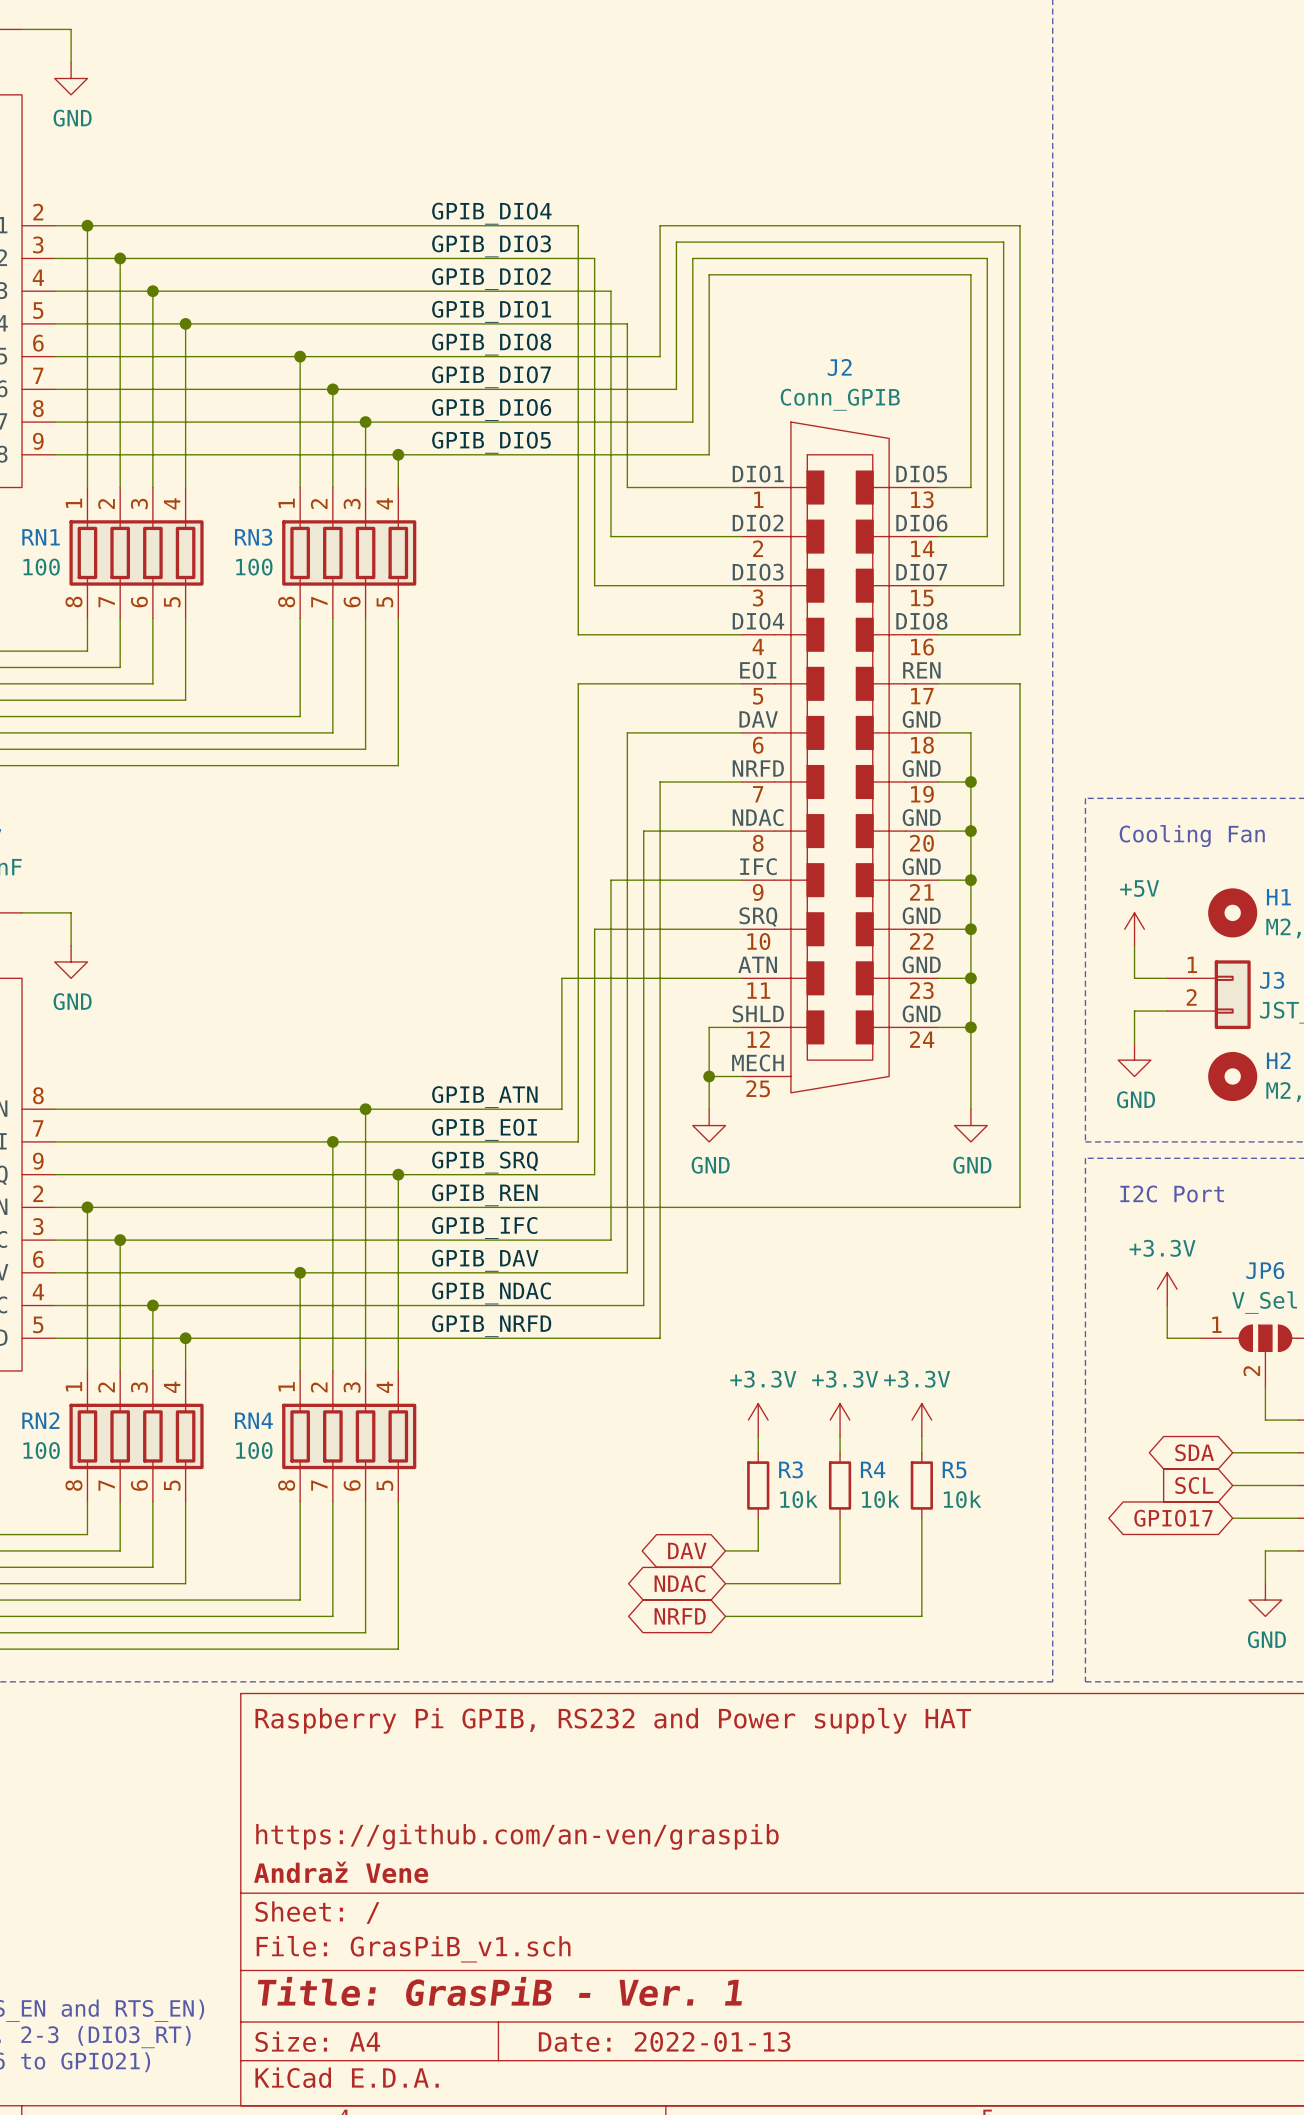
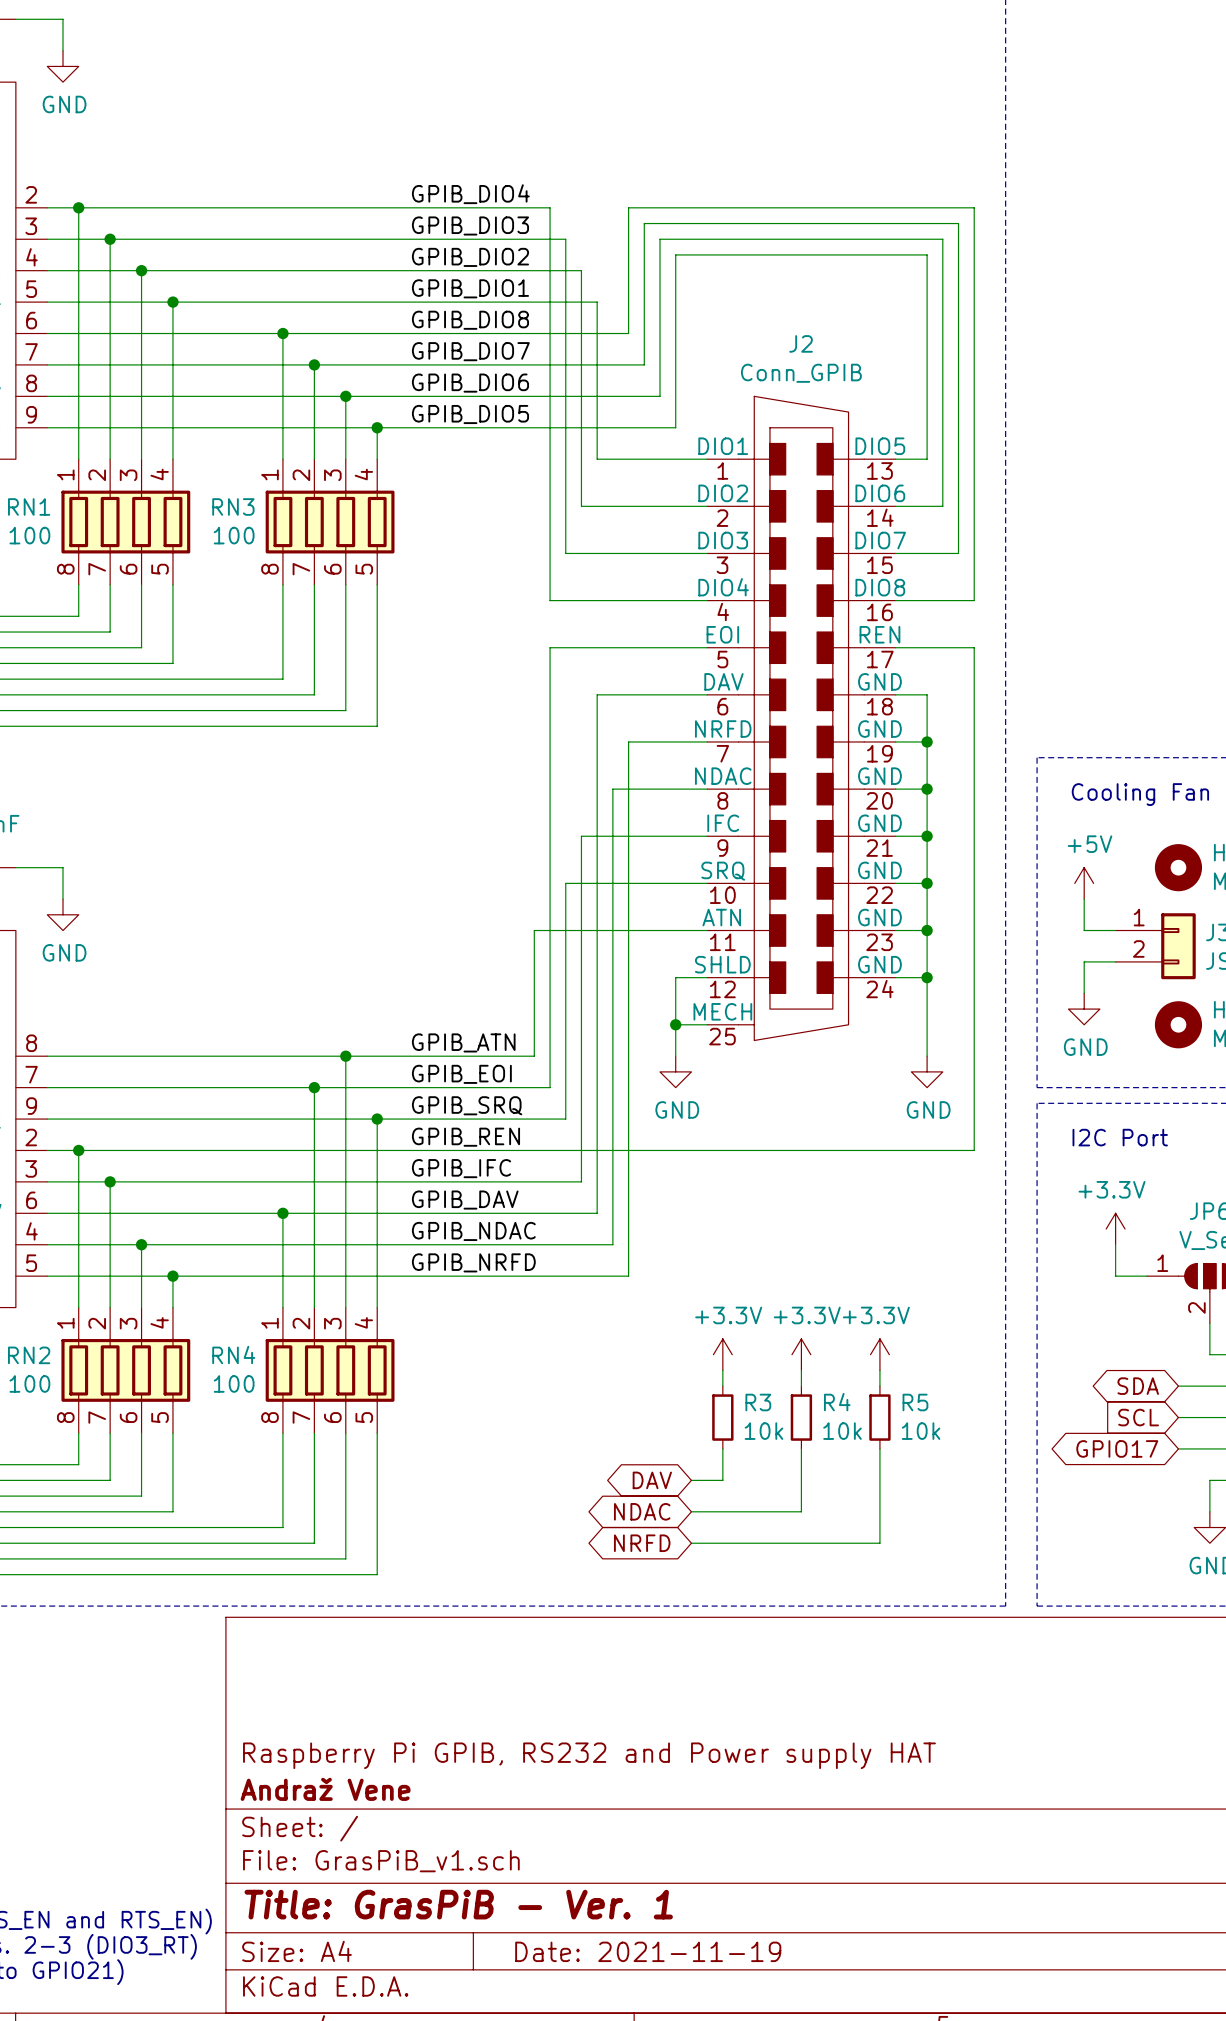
title block: Raspberry Pi GPIB, RS232 and Power supply HAT (613, 1720) -> none
title block: https://github.com/an-ven/graspib (517, 1836) -> Raspberry Pi GPIB, RS232 and Power supply HAT (589, 1755)
title block: Date: 2022-01-13 (664, 2041) -> Date: 2021-11-19 (648, 1951)

